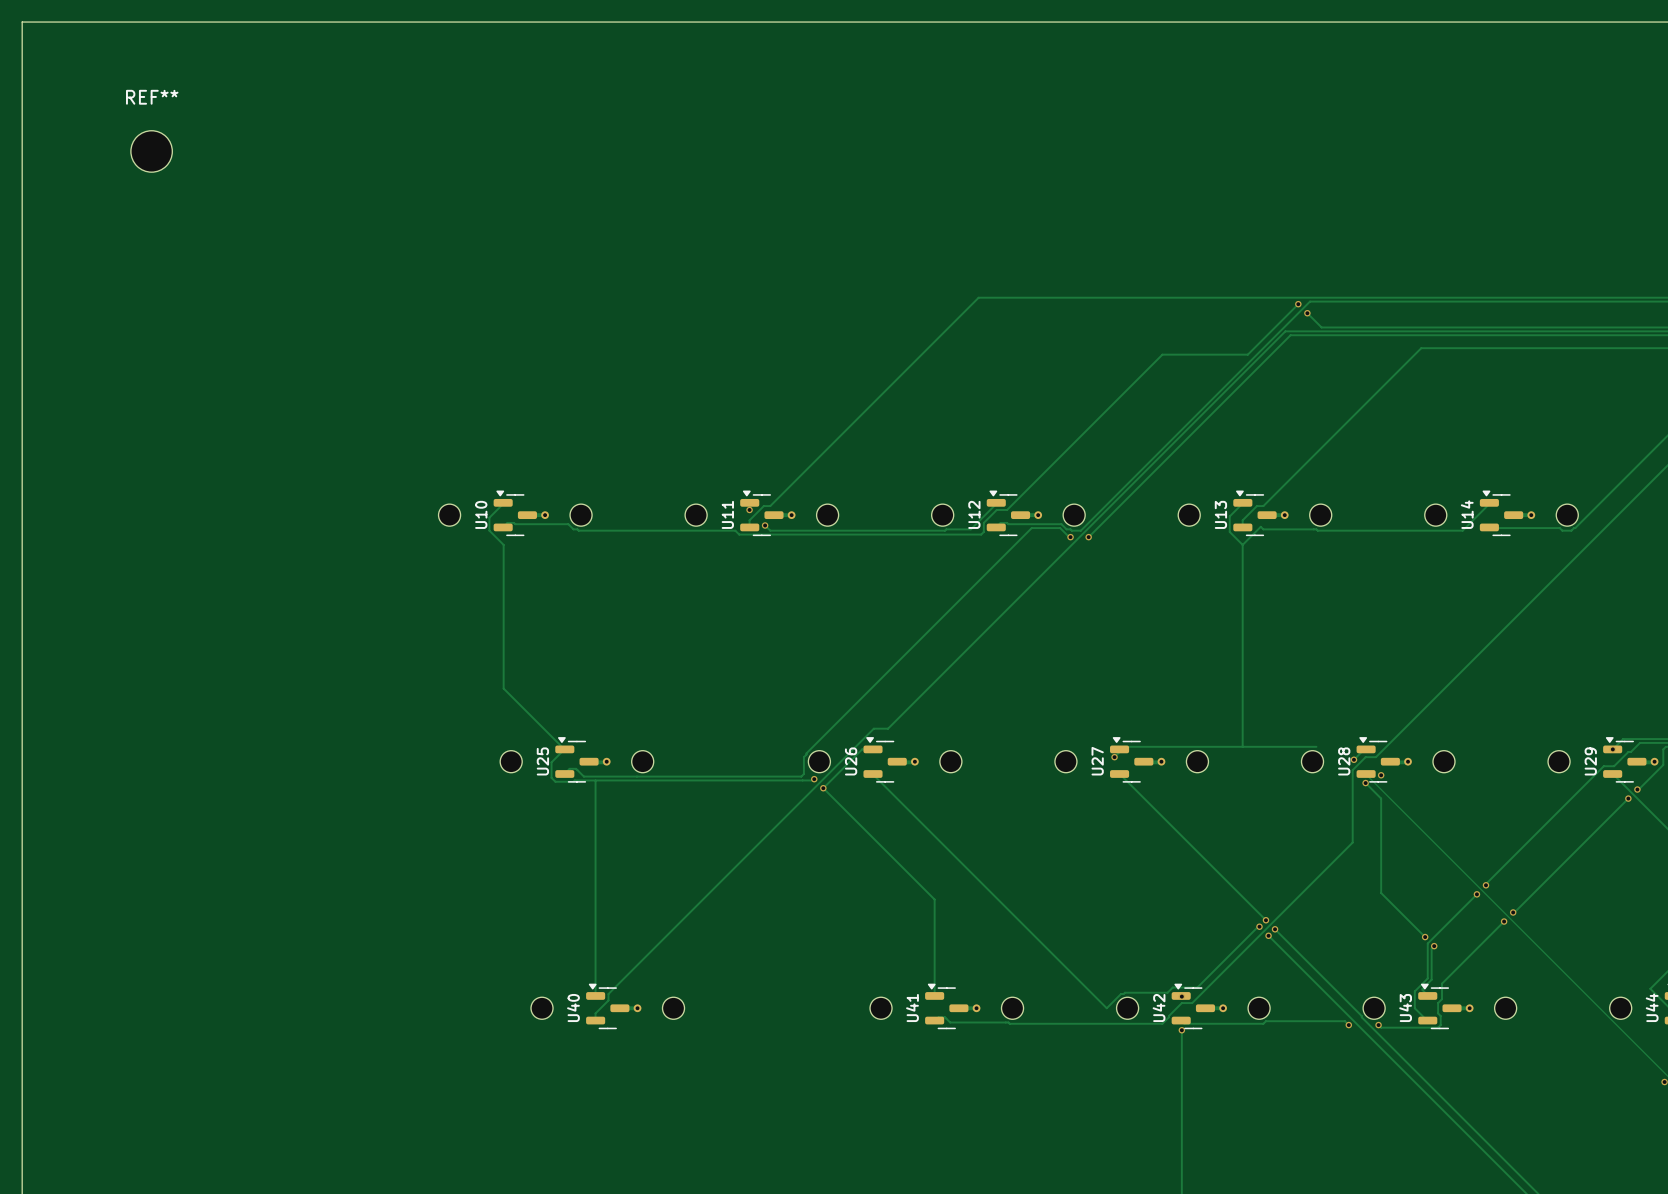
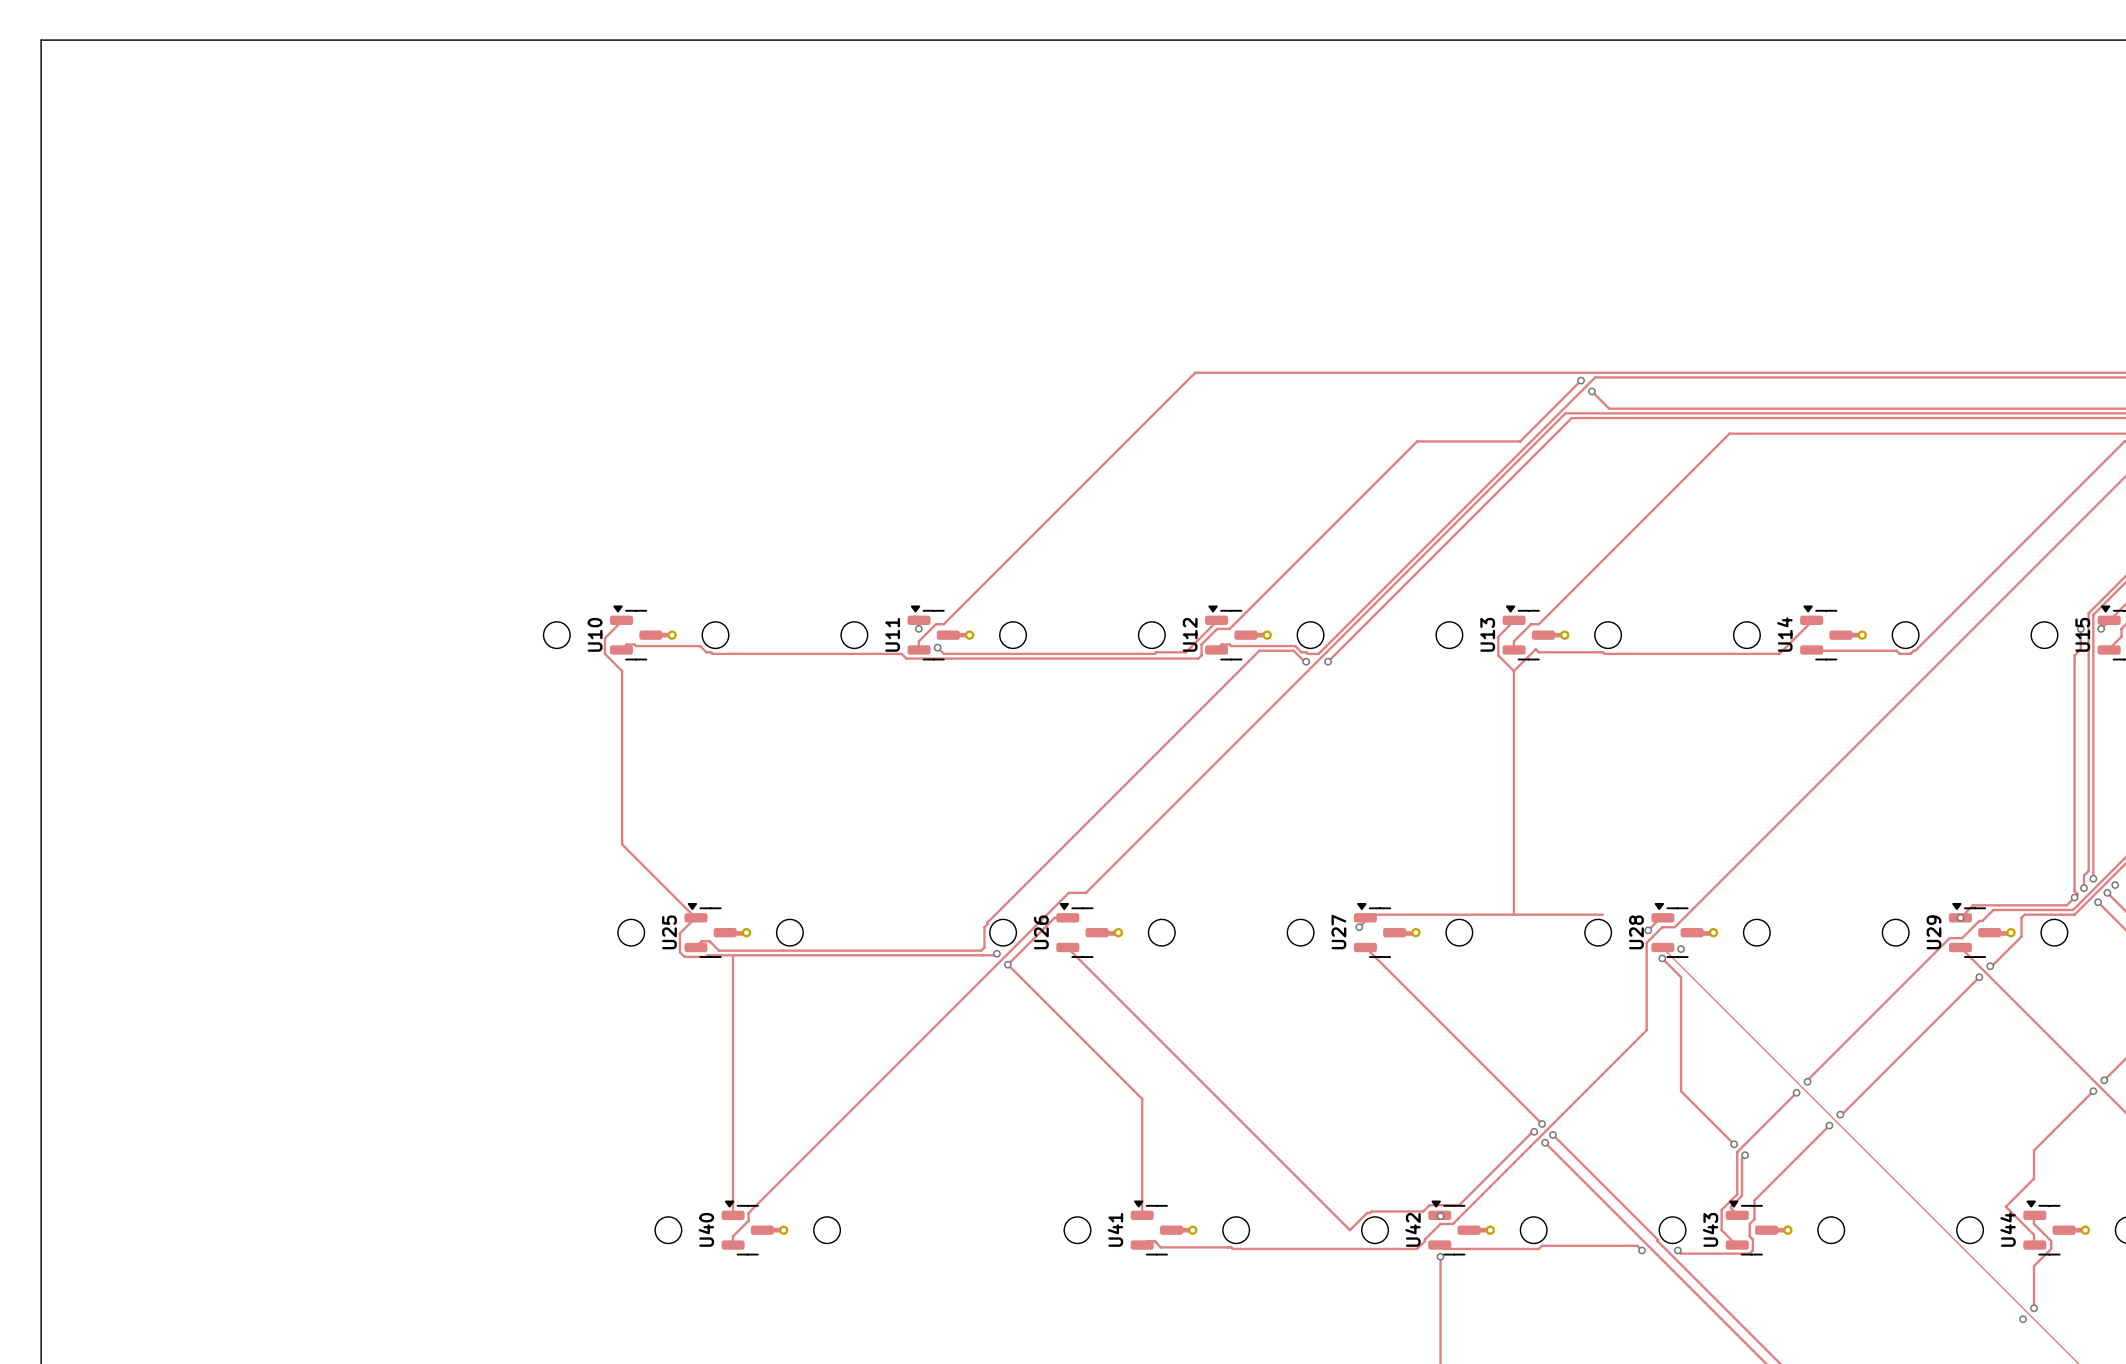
REF**: (151, 151) -> none

